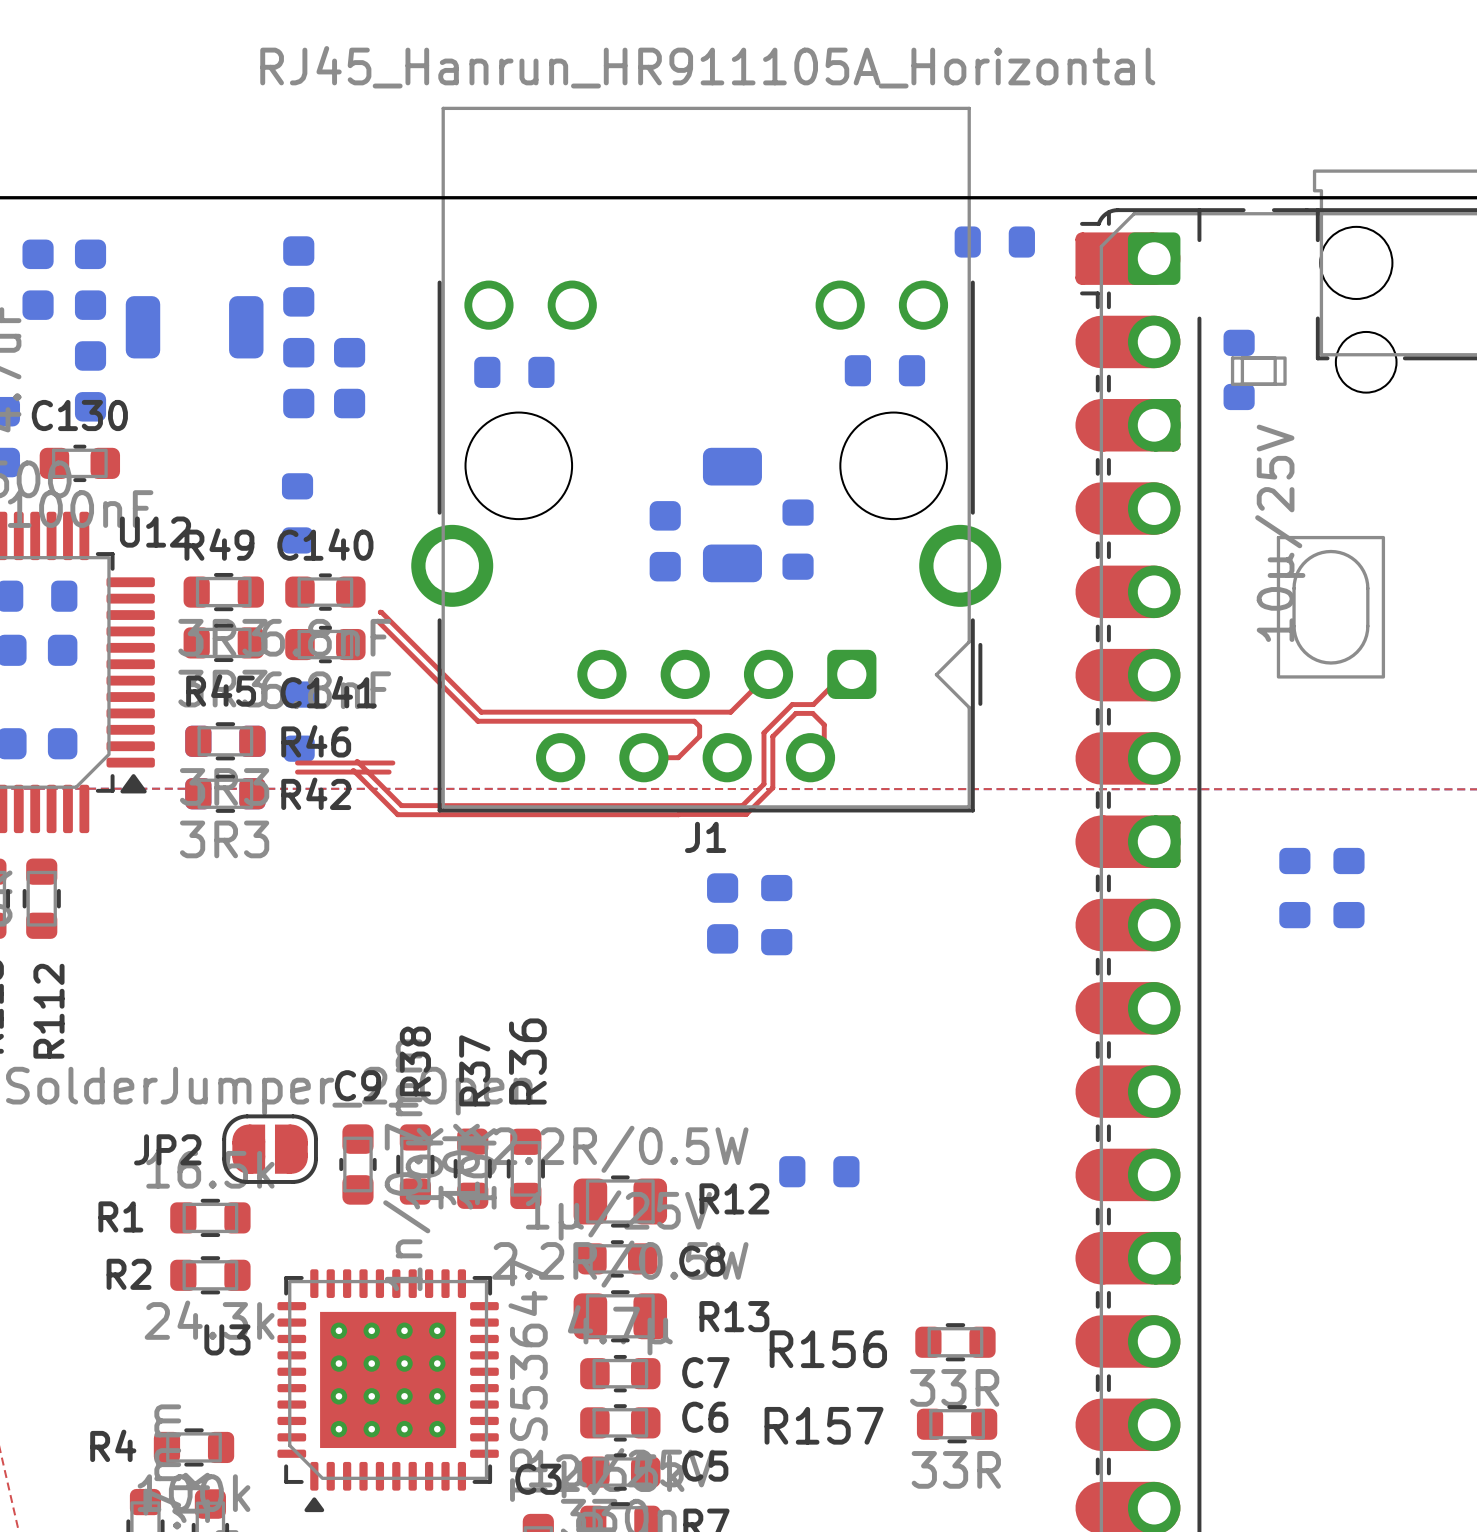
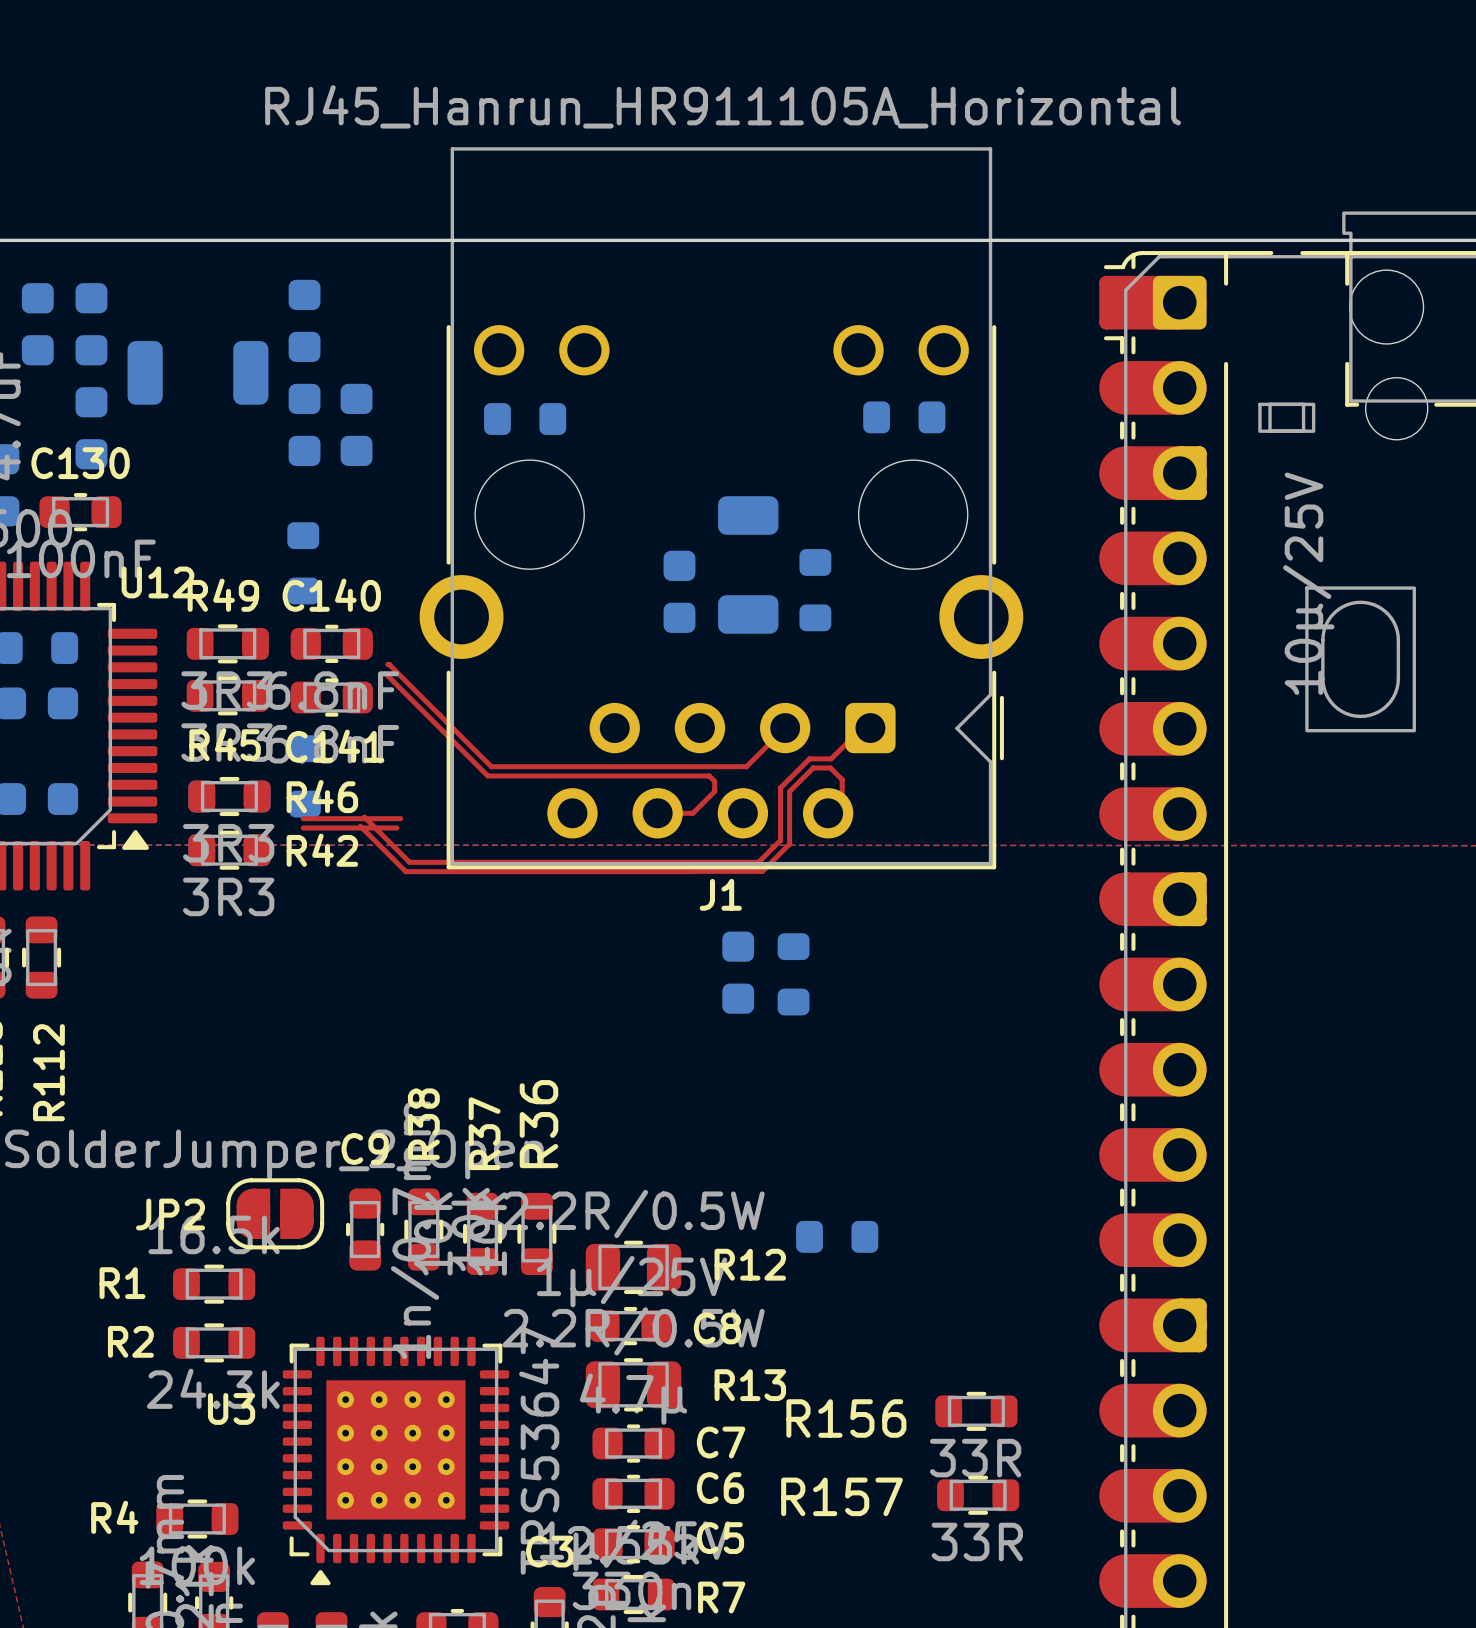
part: (994, 242) -> none
part: (1239, 369) -> none
part: (1294, 888) -> none
part: (1348, 888) -> none

